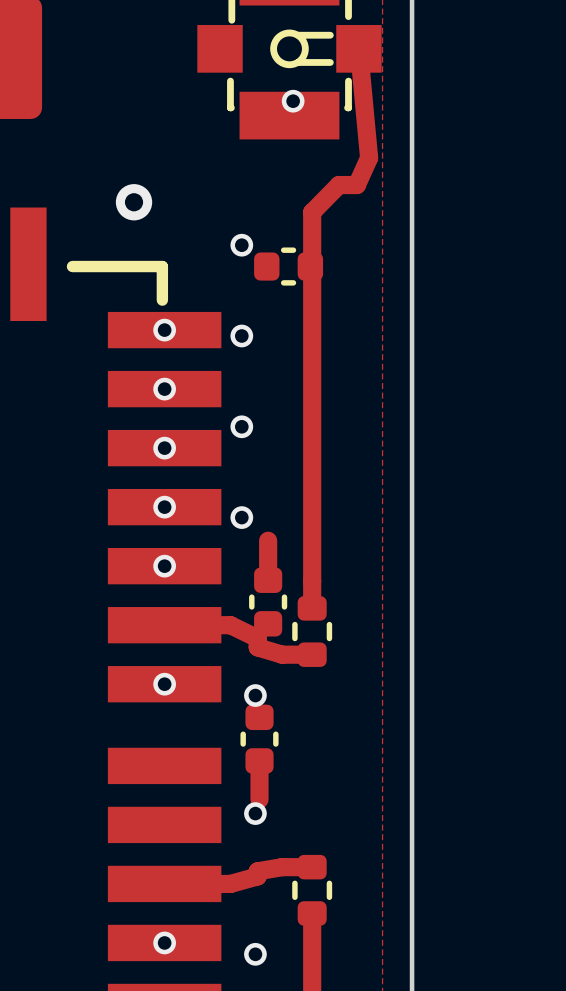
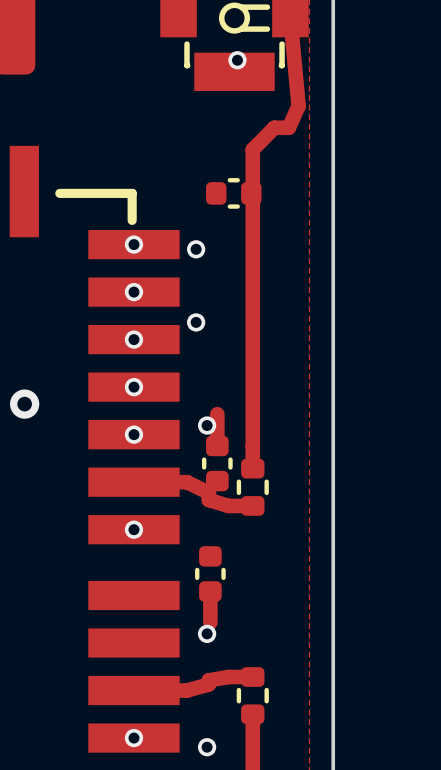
via: (134, 202) -> none
via: (241, 245) -> none
via position: (241, 517) -> (207, 425)
via: none -> (24, 404)
via: (255, 695) -> none

